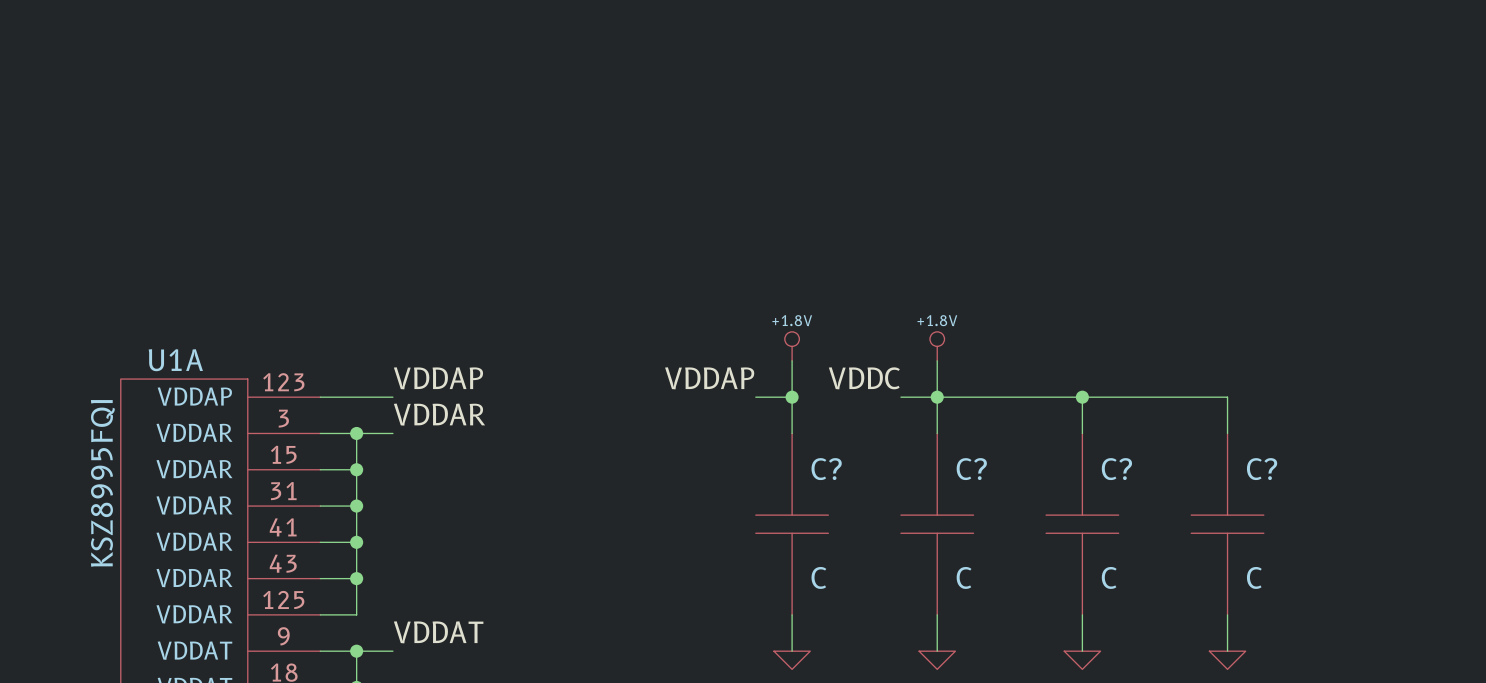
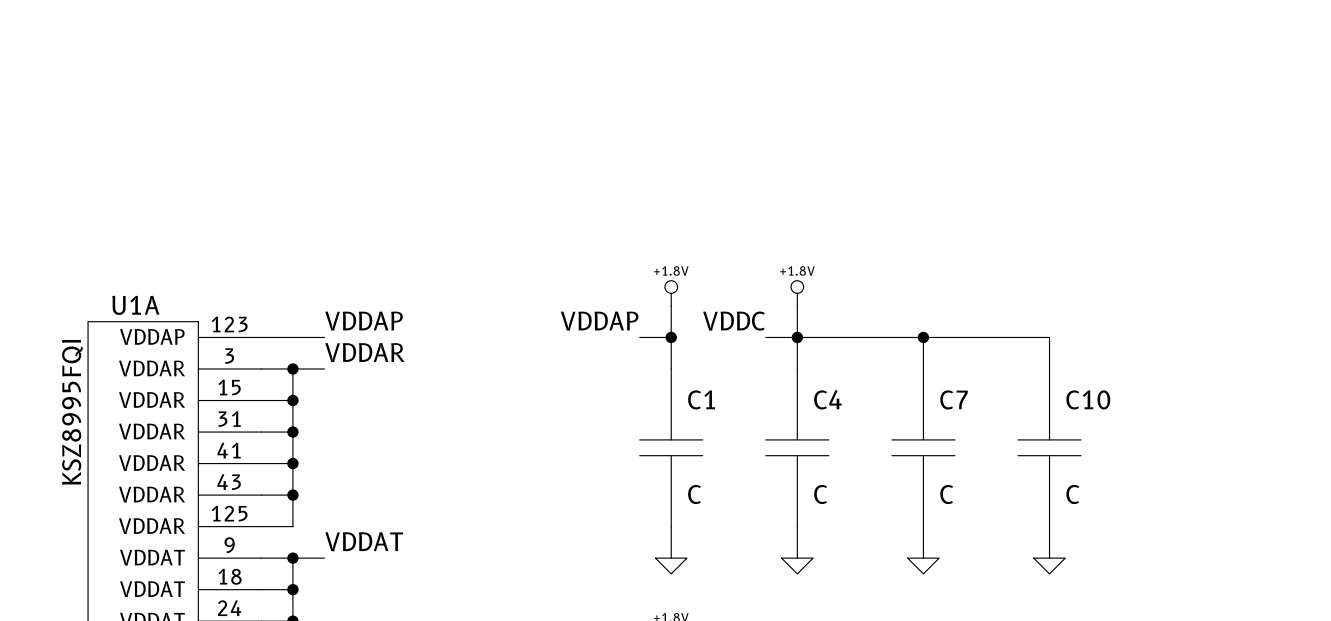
C? name: C? (826, 469) -> C1 (701, 399)
C? name: C? (971, 469) -> C4 (827, 399)
C? name: C? (1116, 469) -> C7 (954, 399)
C? name: C? (1262, 469) -> C10 (1088, 399)

